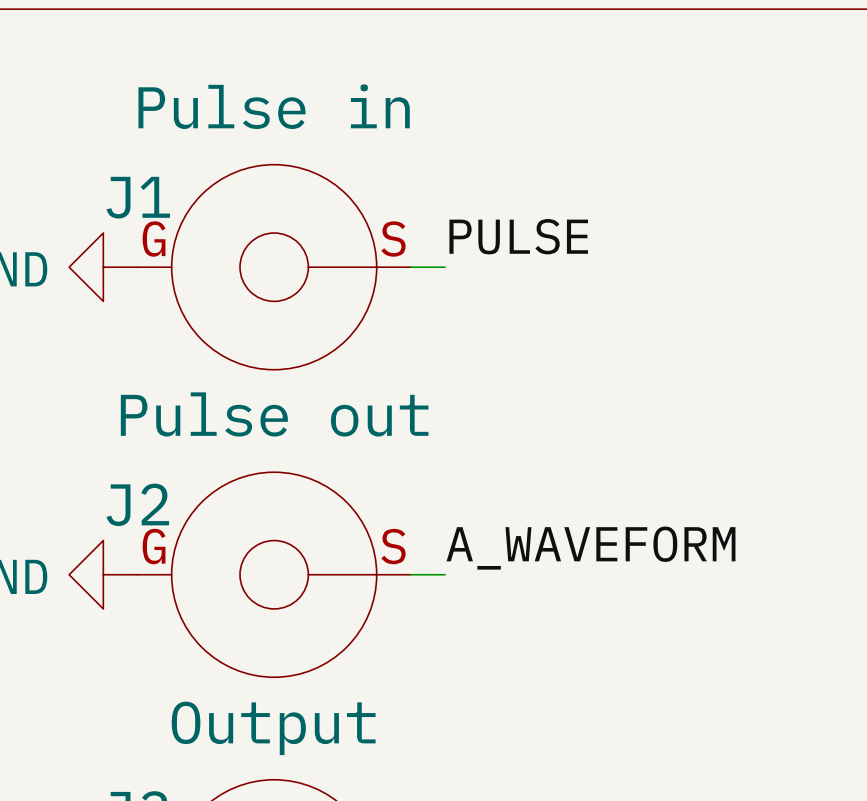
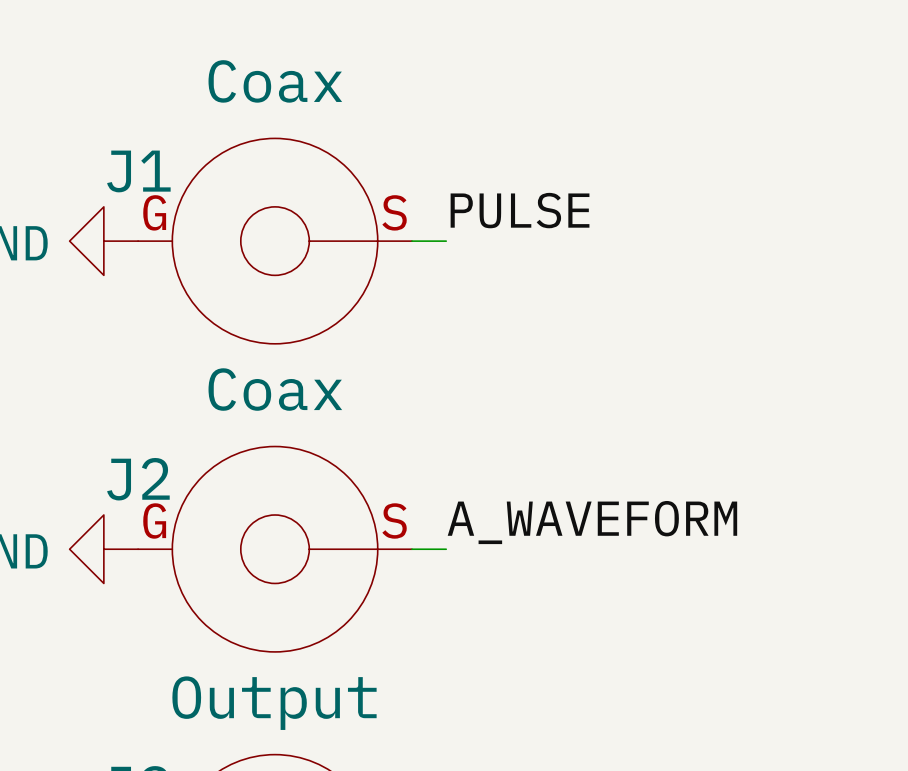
J1 value: Pulse in (274, 106) -> Coax (275, 81)
J2 value: Pulse out (274, 414) -> Coax (275, 389)

